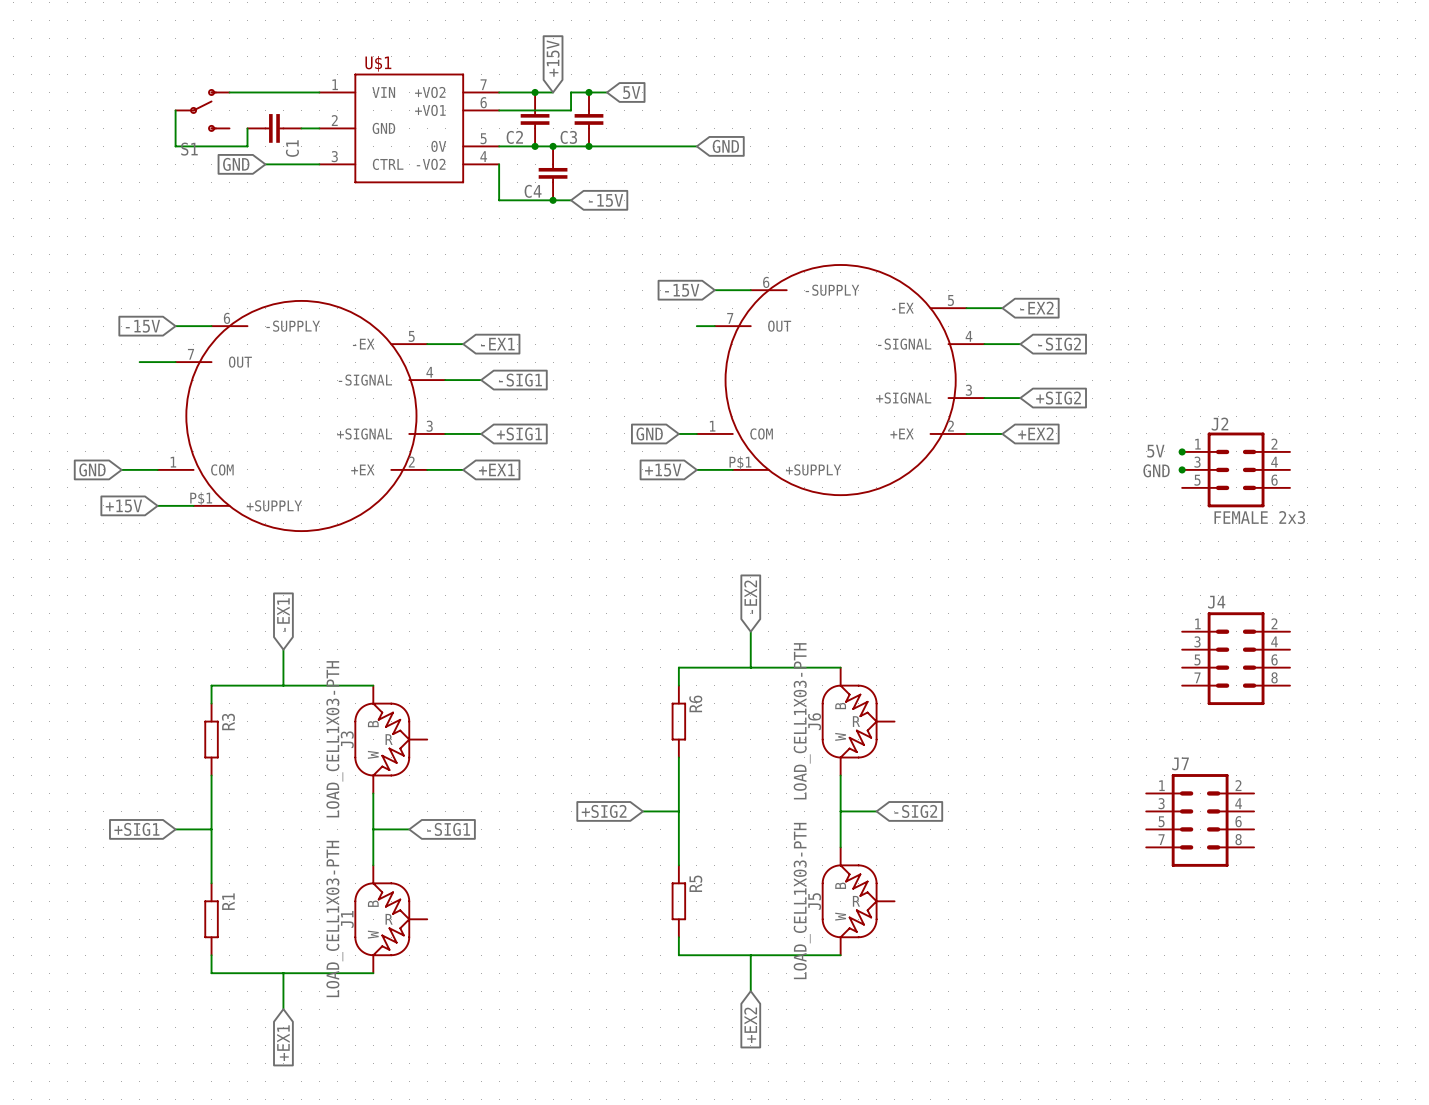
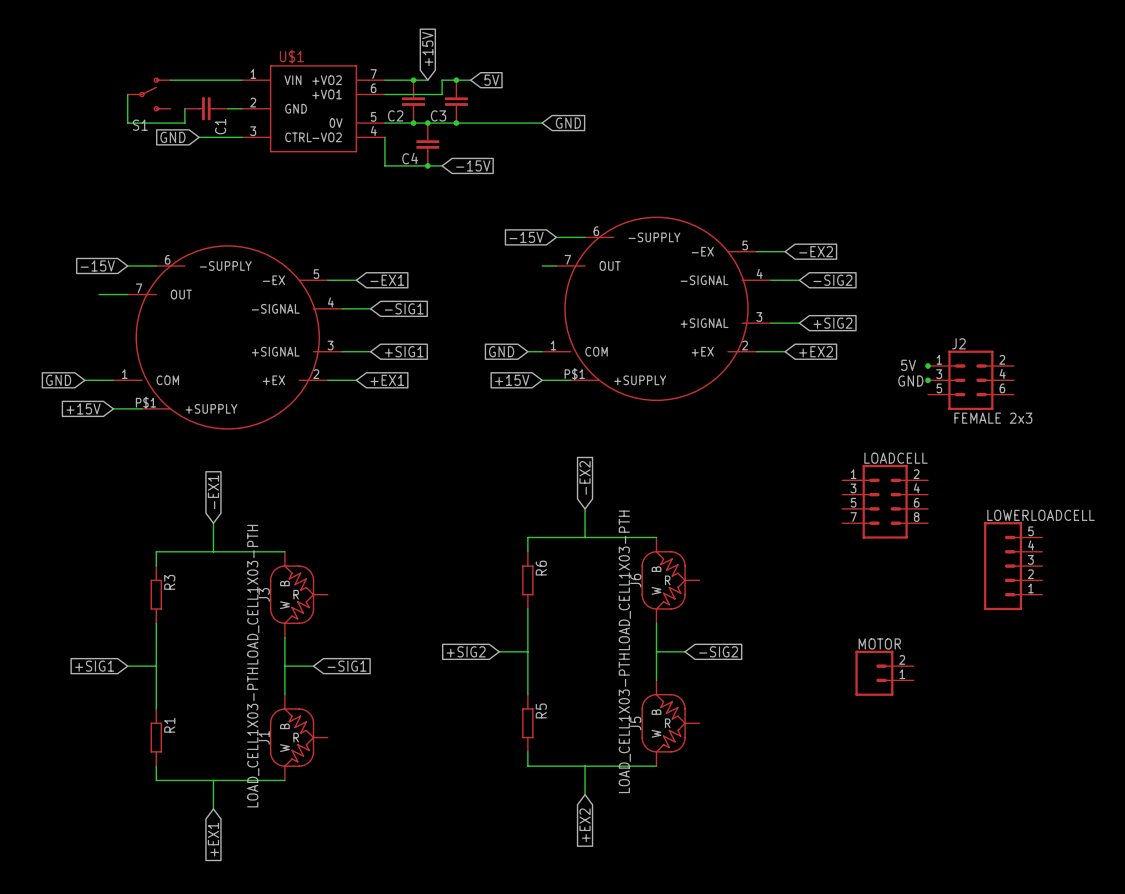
LOADCELL: none -> (885, 501)
J4: (1236, 658) -> none
LOWERLOADCELL: none -> (1013, 566)
J7: (1200, 820) -> none
MOTOR: none -> (884, 673)

